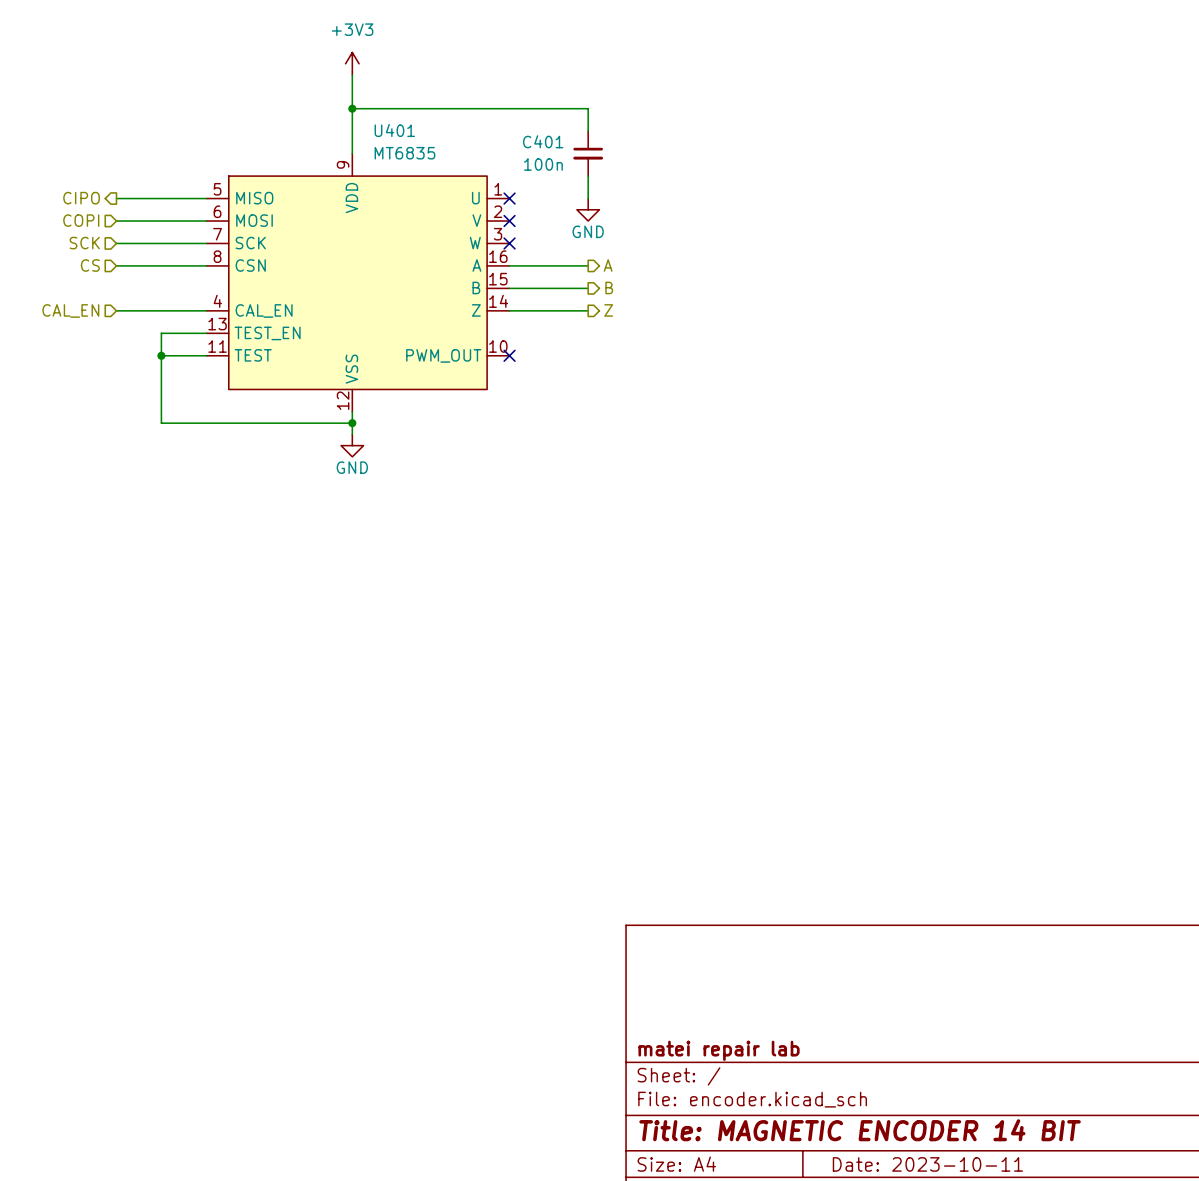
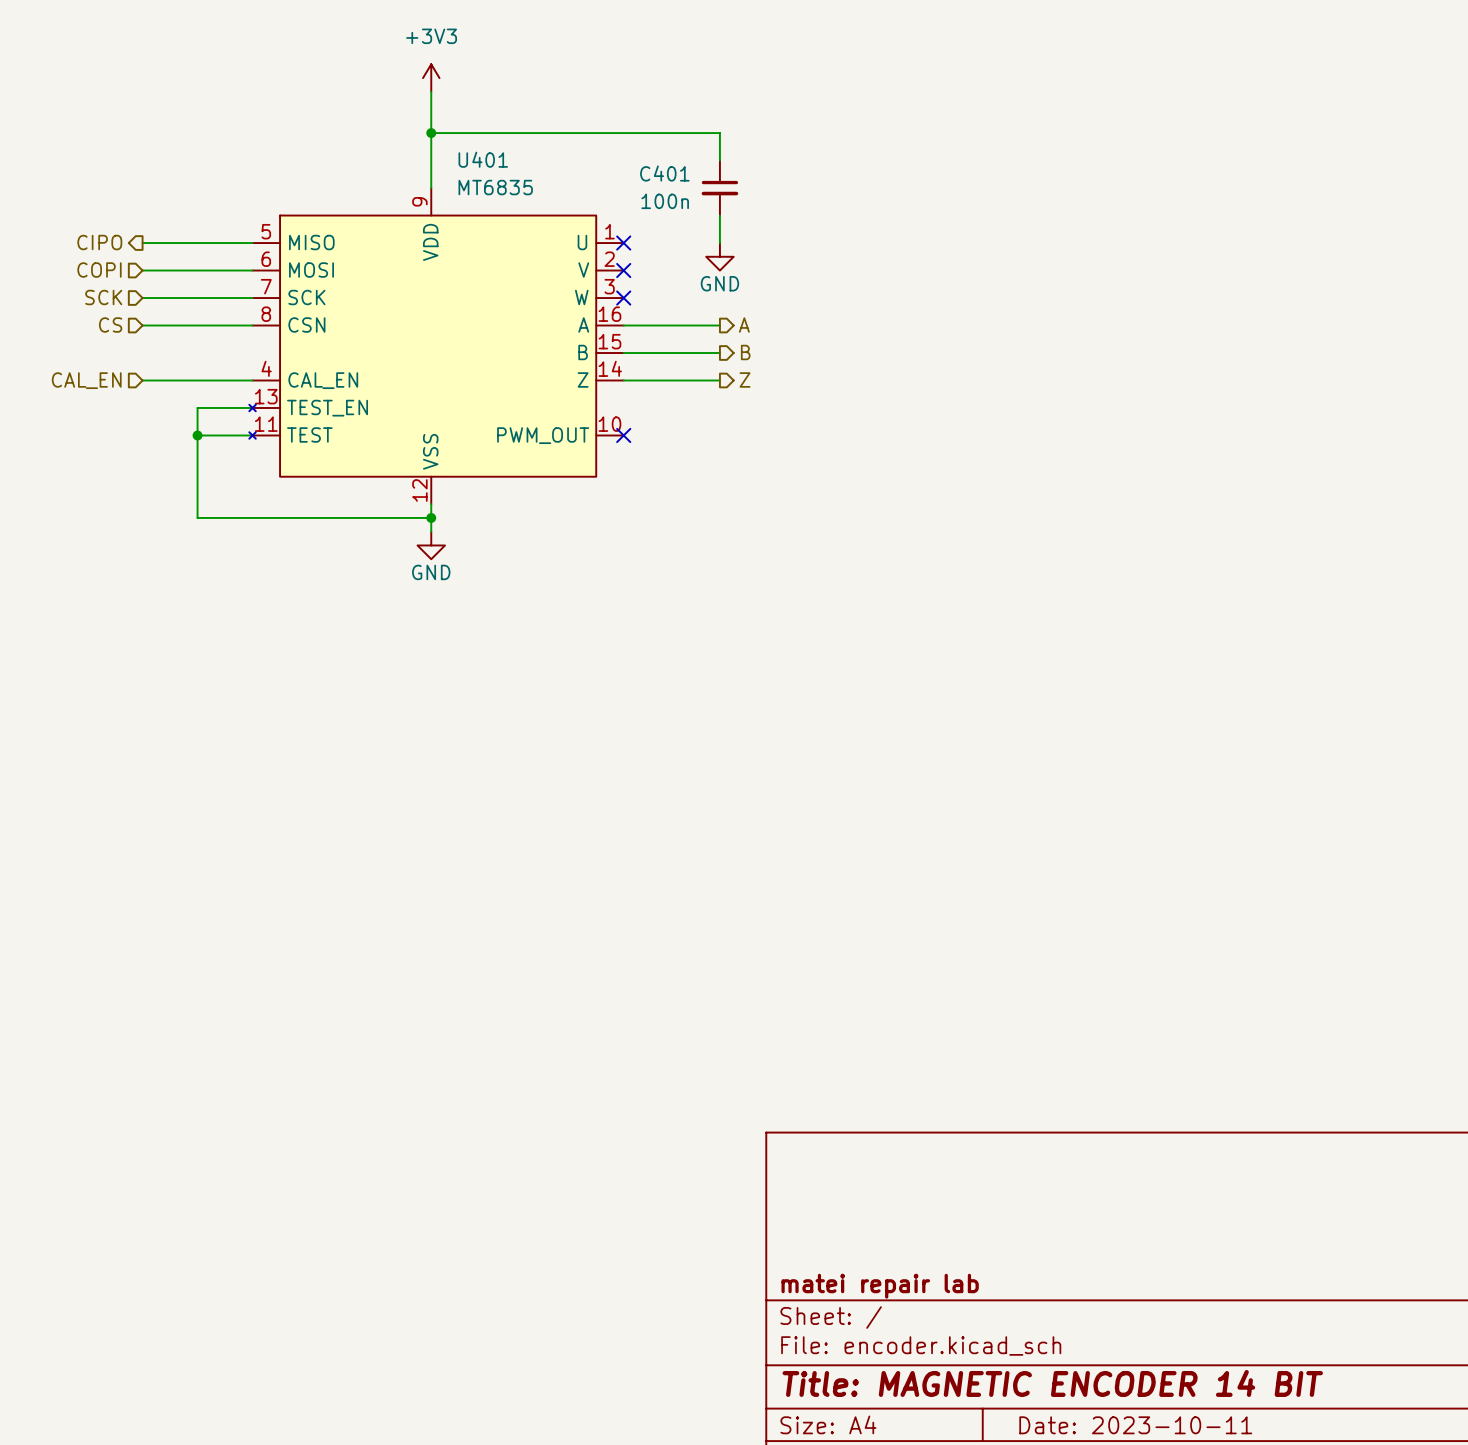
U401 symbol: [206, 153, 510, 412] -> [249, 188, 624, 505]

